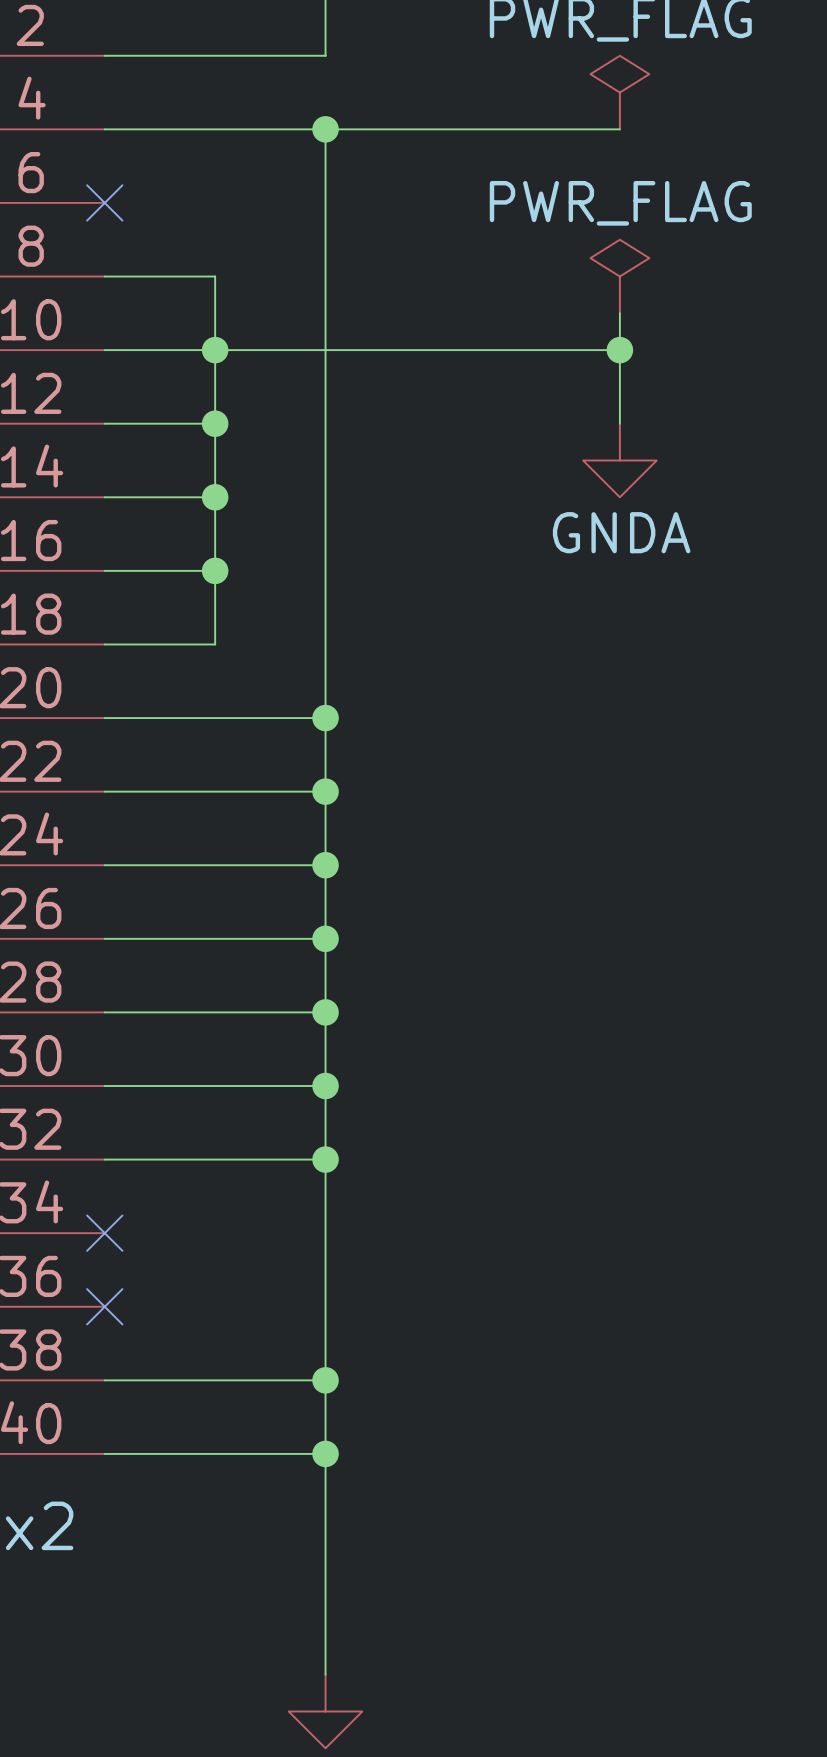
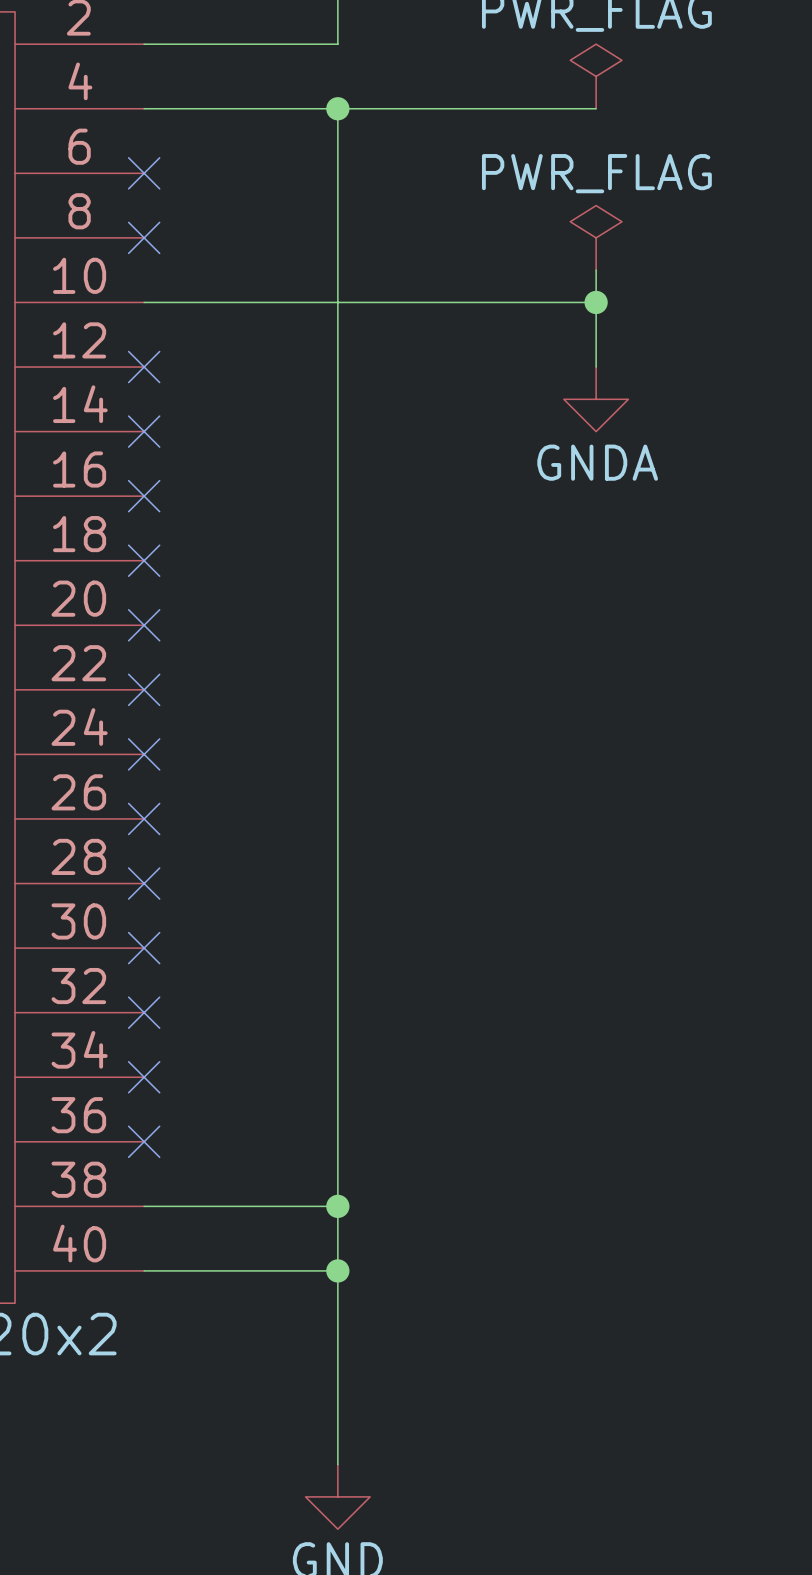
wire: (104, 276) (215, 276) (215, 644) (104, 644) -> none
no-connect mark: none -> (144, 237)
junction: (215, 350) -> none
wire: (104, 423) (215, 423) -> none
no-connect mark: none -> (144, 367)
junction: (215, 423) -> none
wire: (104, 497) (215, 497) -> none
no-connect mark: none -> (144, 431)
junction: (215, 497) -> none
wire: (104, 570) (215, 570) -> none
no-connect mark: none -> (144, 496)
junction: (215, 570) -> none
no-connect mark: none -> (144, 560)
wire: (104, 718) (325, 718) -> none
no-connect mark: none -> (144, 625)
junction: (325, 718) -> none
wire: (104, 791) (325, 791) -> none
no-connect mark: none -> (144, 689)
junction: (325, 791) -> none
wire: (104, 865) (325, 865) -> none
no-connect mark: none -> (144, 754)
junction: (325, 865) -> none
wire: (104, 938) (325, 938) -> none
no-connect mark: none -> (144, 818)
junction: (325, 938) -> none
wire: (104, 1012) (325, 1012) -> none
no-connect mark: none -> (144, 883)
junction: (325, 1012) -> none
wire: (104, 1085) (325, 1085) -> none
no-connect mark: none -> (144, 948)
junction: (325, 1085) -> none
wire: (104, 1159) (325, 1159) -> none
no-connect mark: none -> (144, 1012)
junction: (325, 1159) -> none

